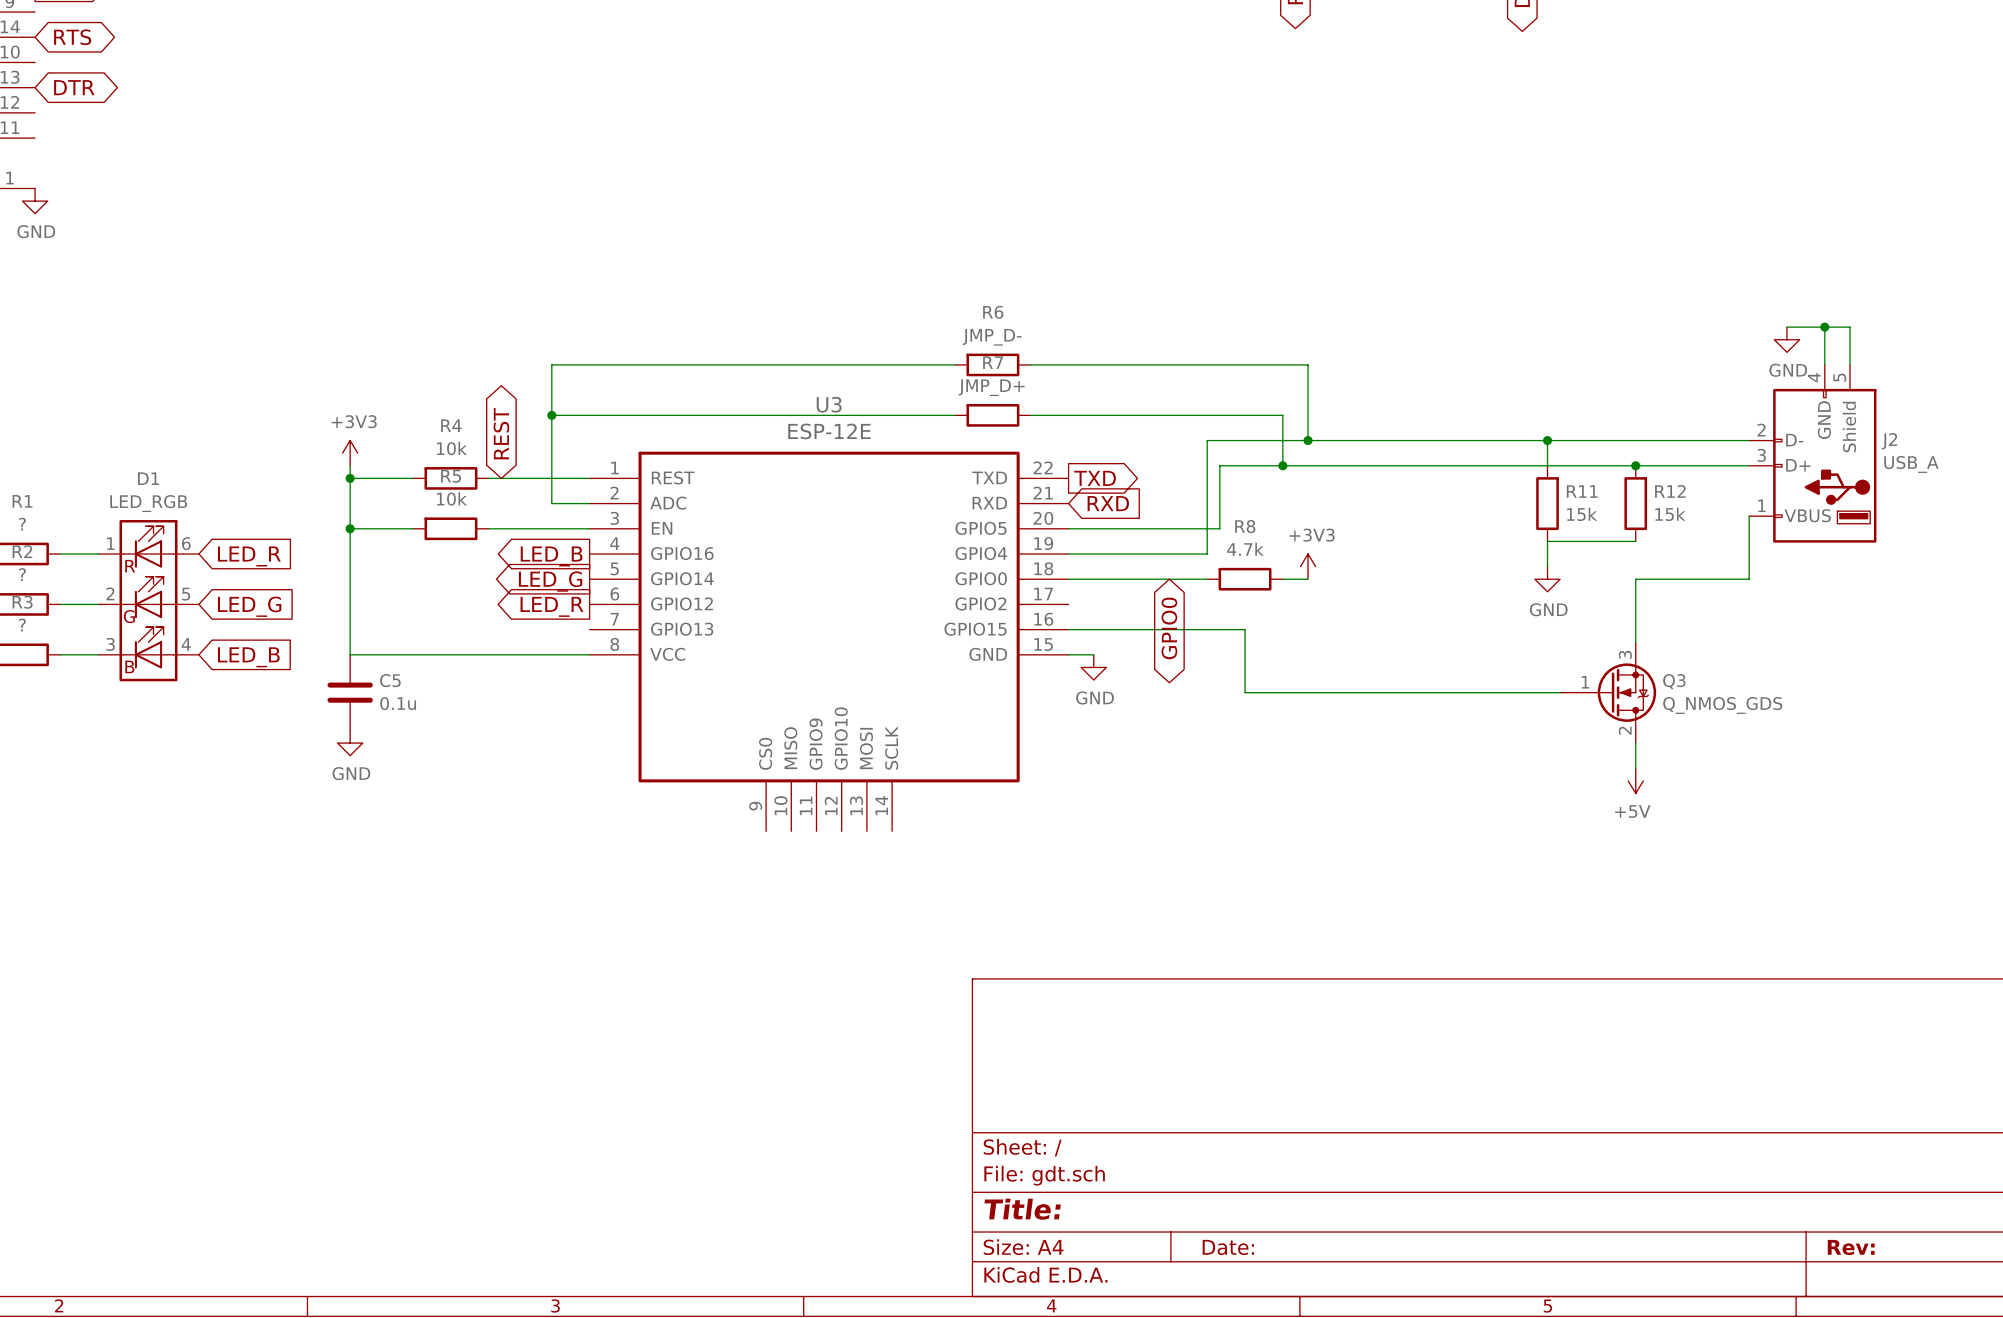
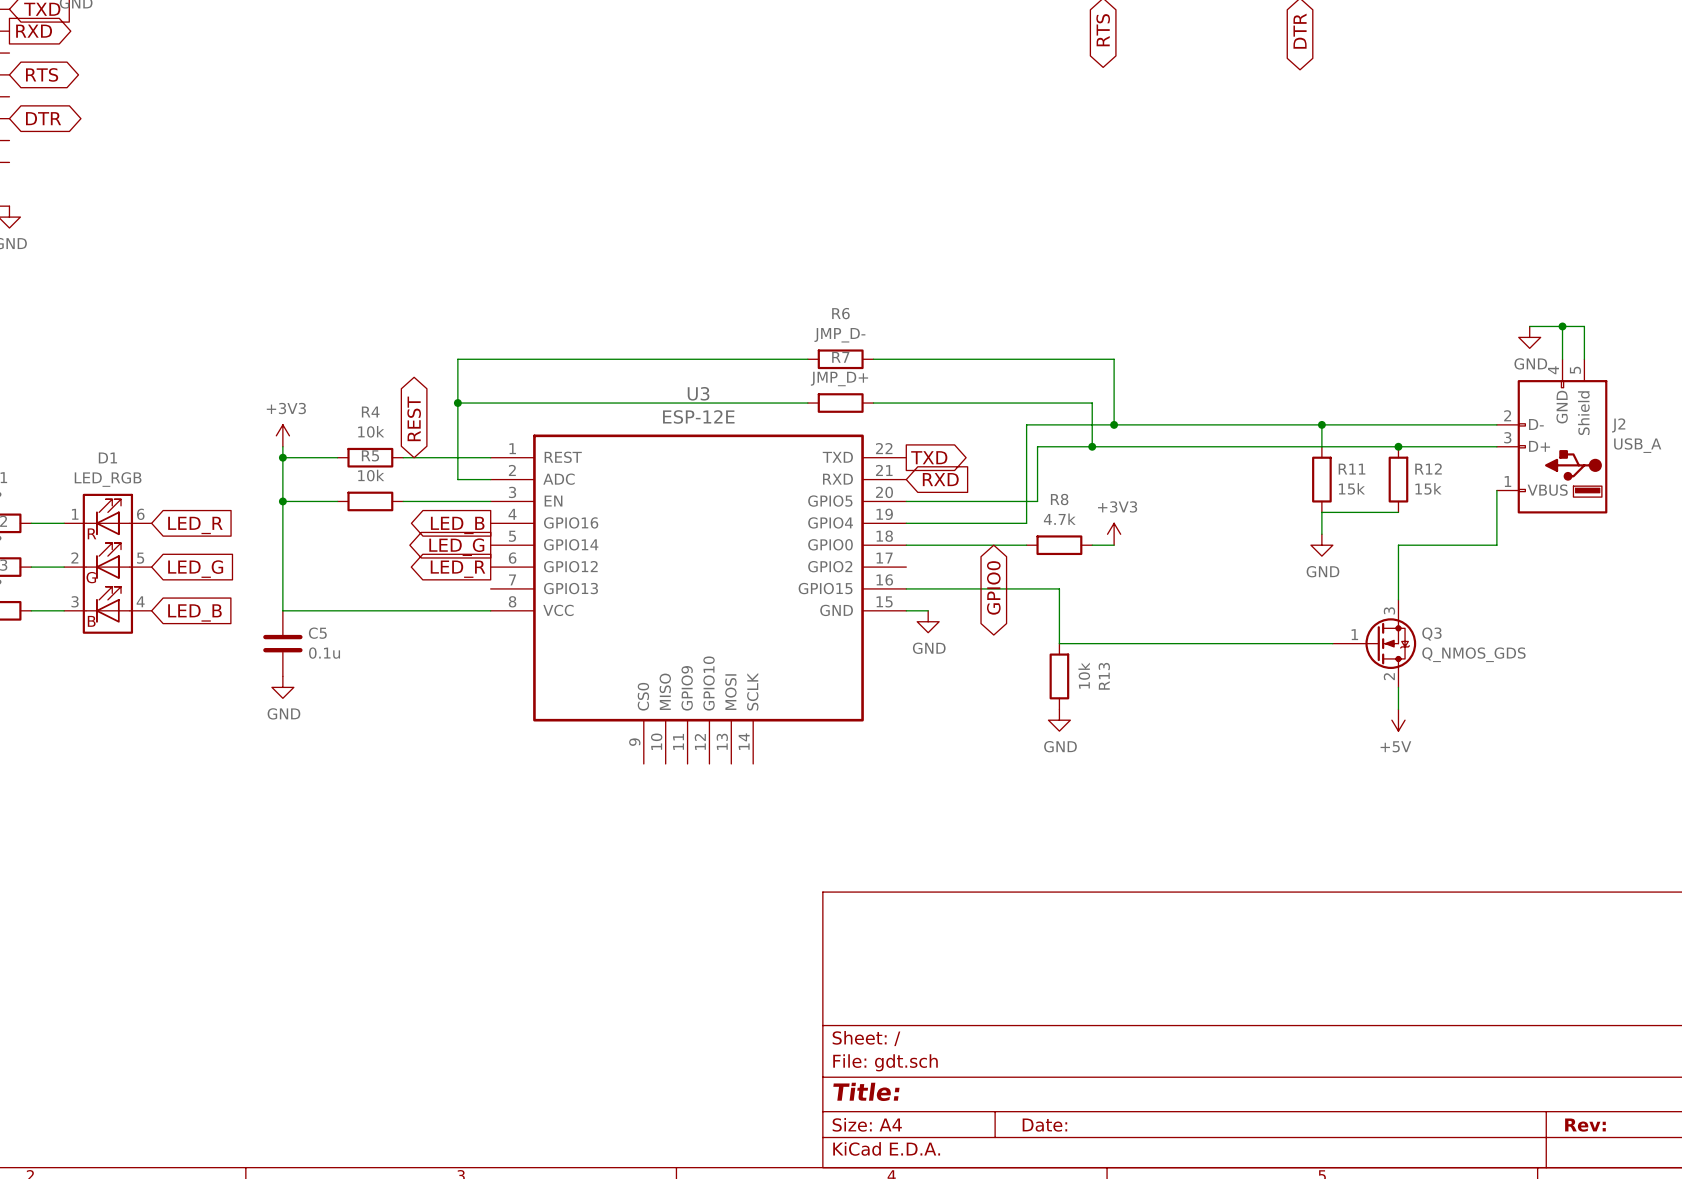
R13: none -> 10k (1059, 676)
power symbol: none -> GND (1059, 720)

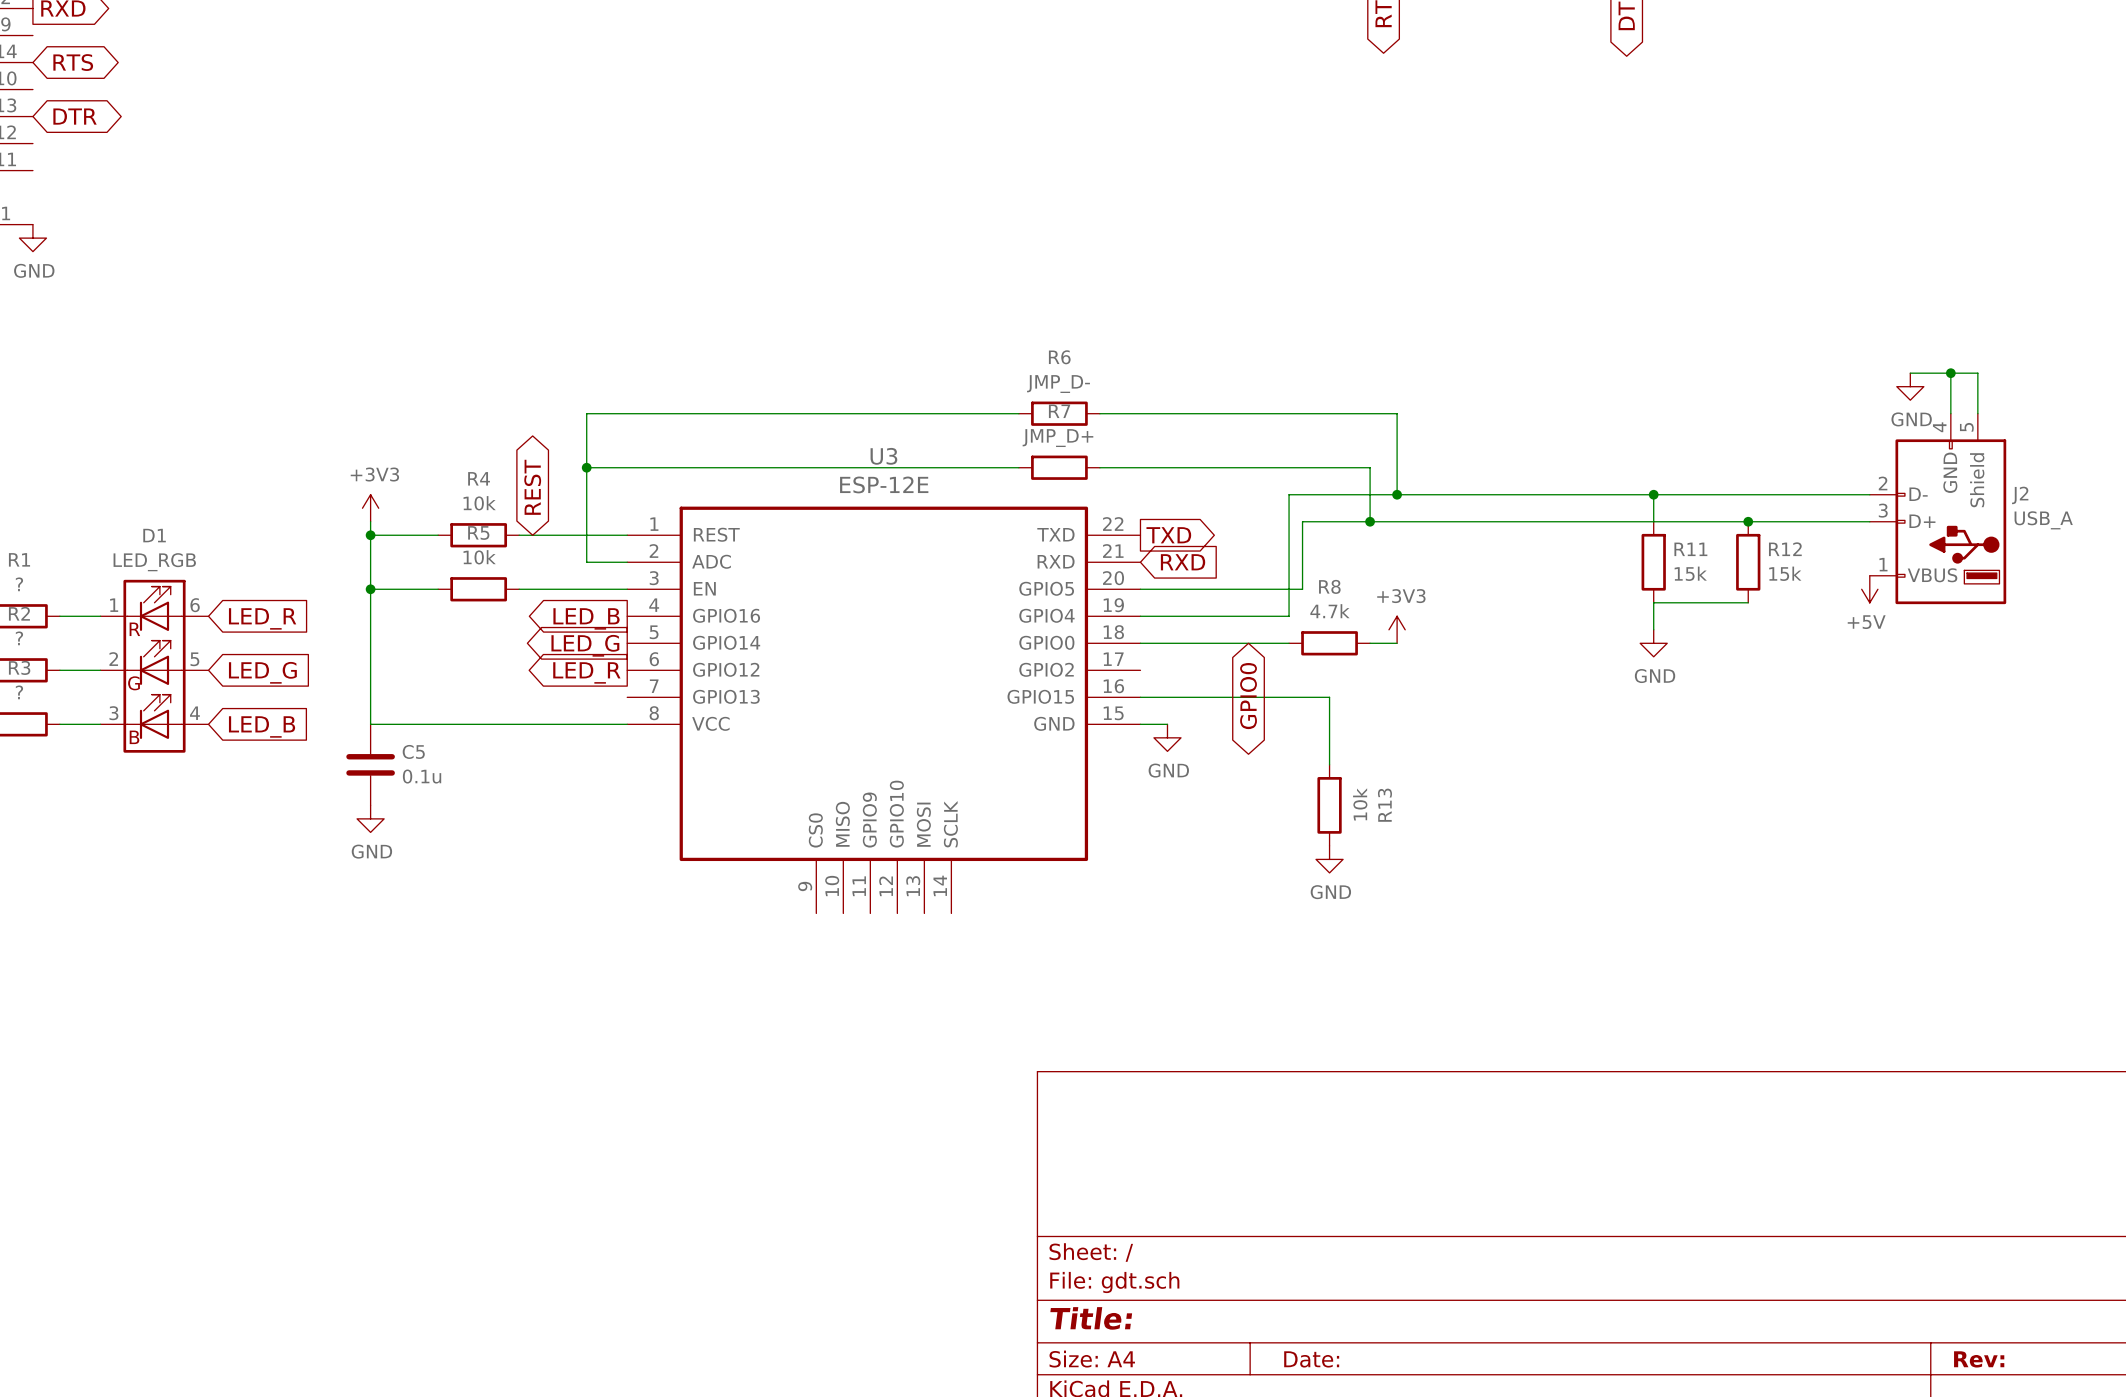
wire: (1496, 490) (1496, 545) (1398, 545) (1398, 599) -> none
power symbol: none -> +5V (1869, 589)
wire: (1059, 643) (1332, 643) -> none
Q3: Q_NMOS_GDS (1374, 643) -> none
wire: (1398, 687) (1398, 709) -> none
power symbol: +5V (1398, 720) -> none

